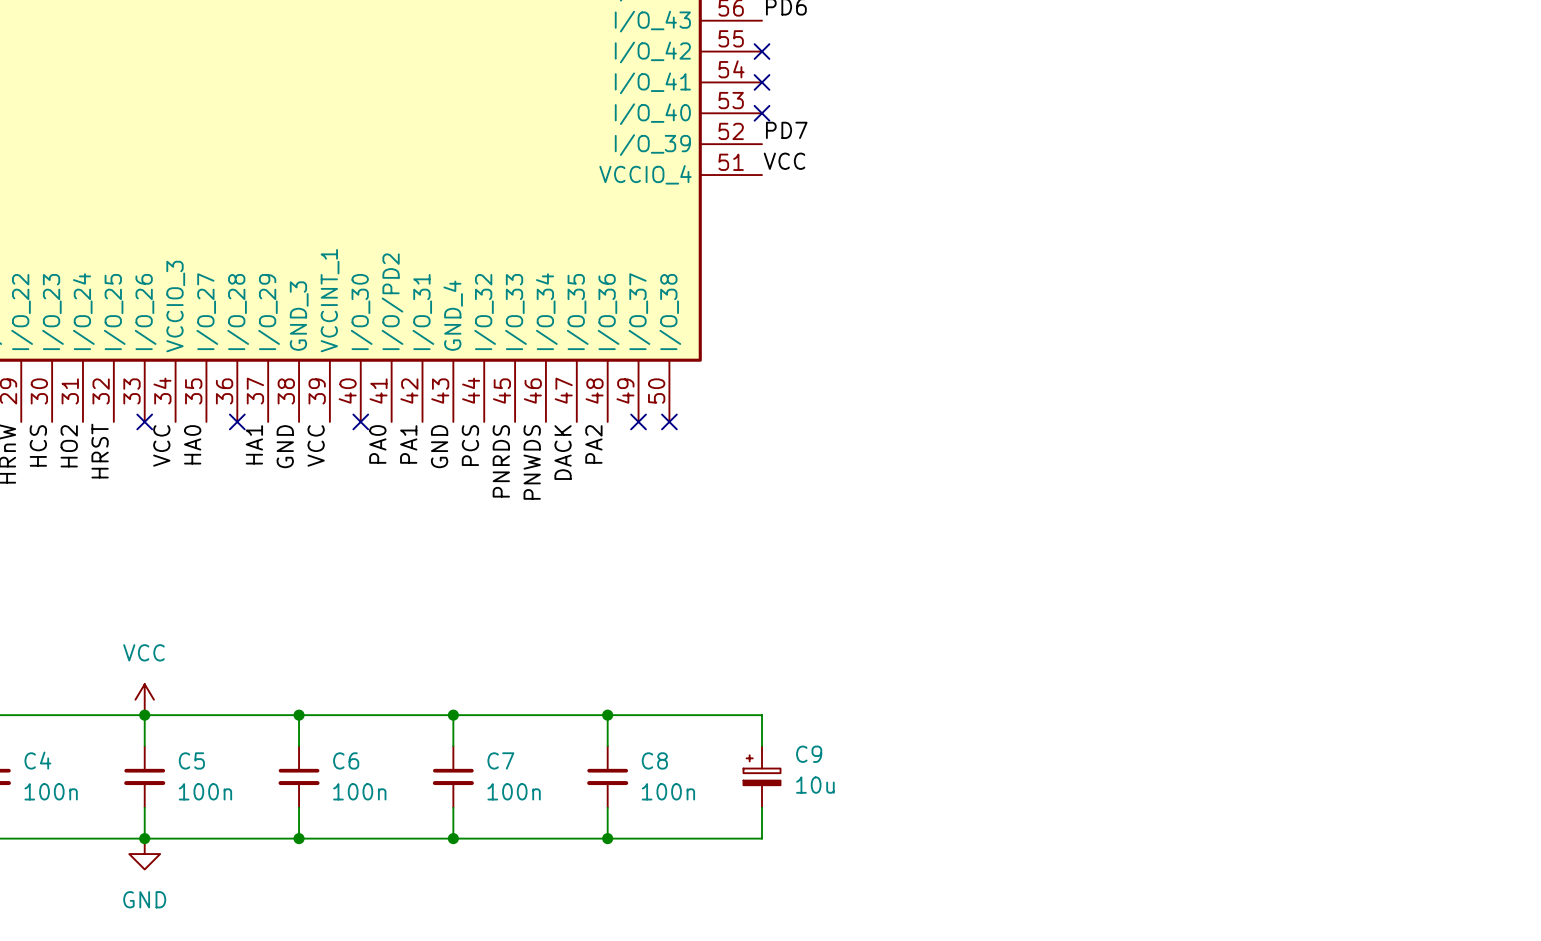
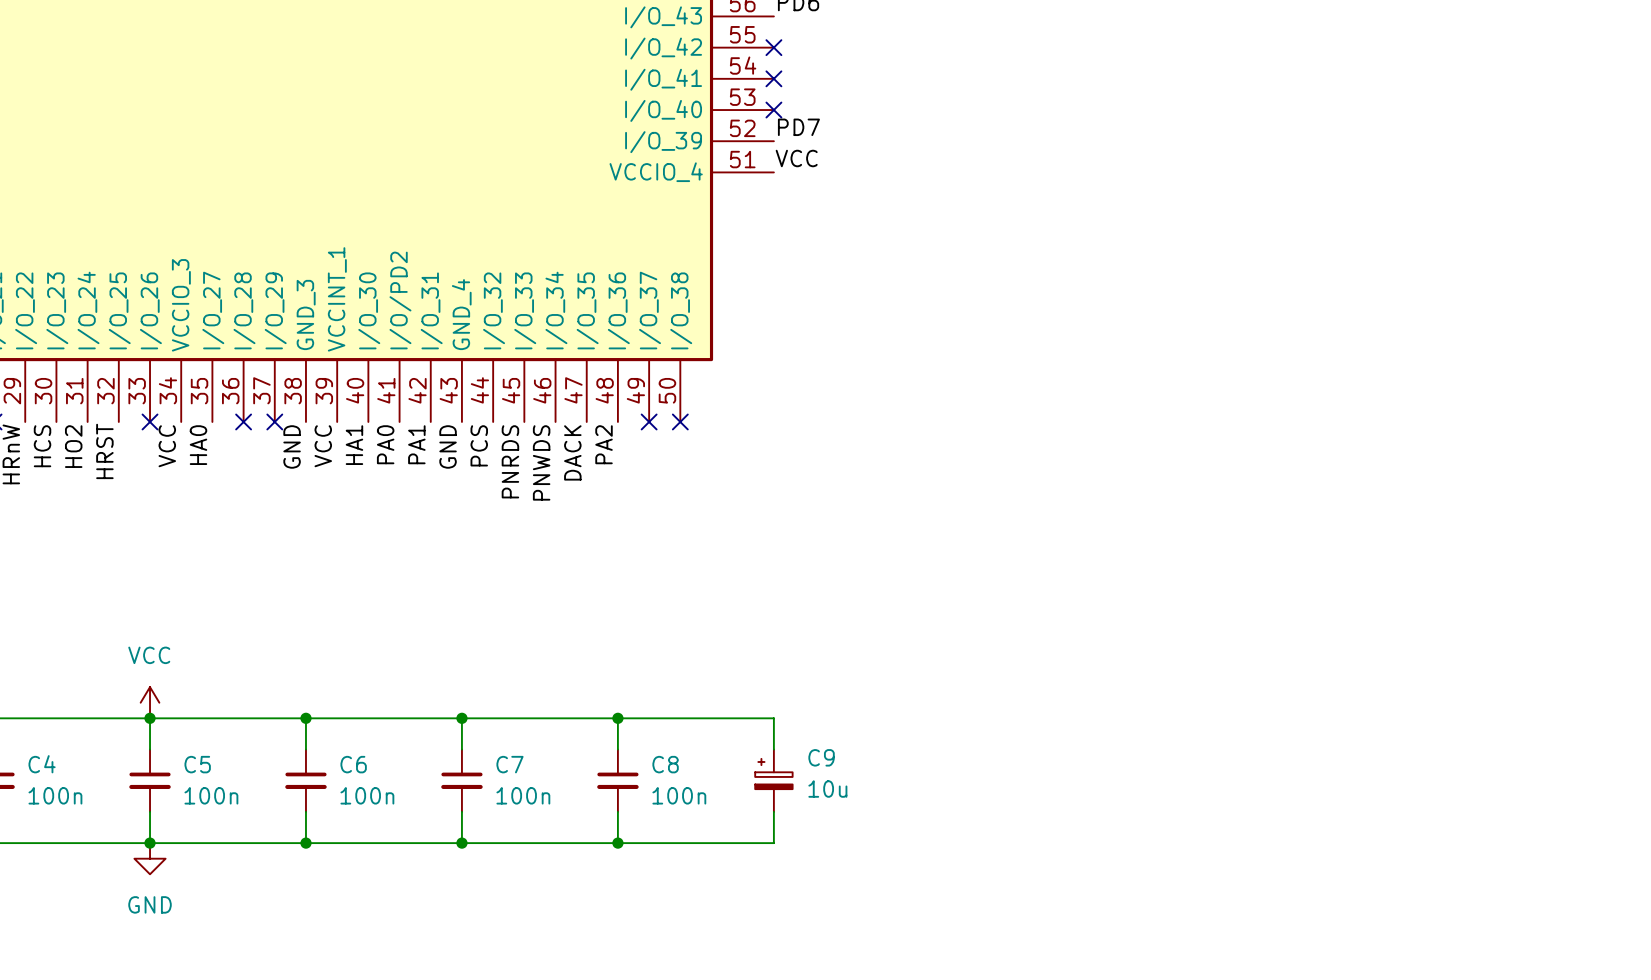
no-connect mark: none -> (274, 421)
no-connect mark: (360, 421) -> none
label position: HA1 (254, 444) -> HA1 (354, 445)

